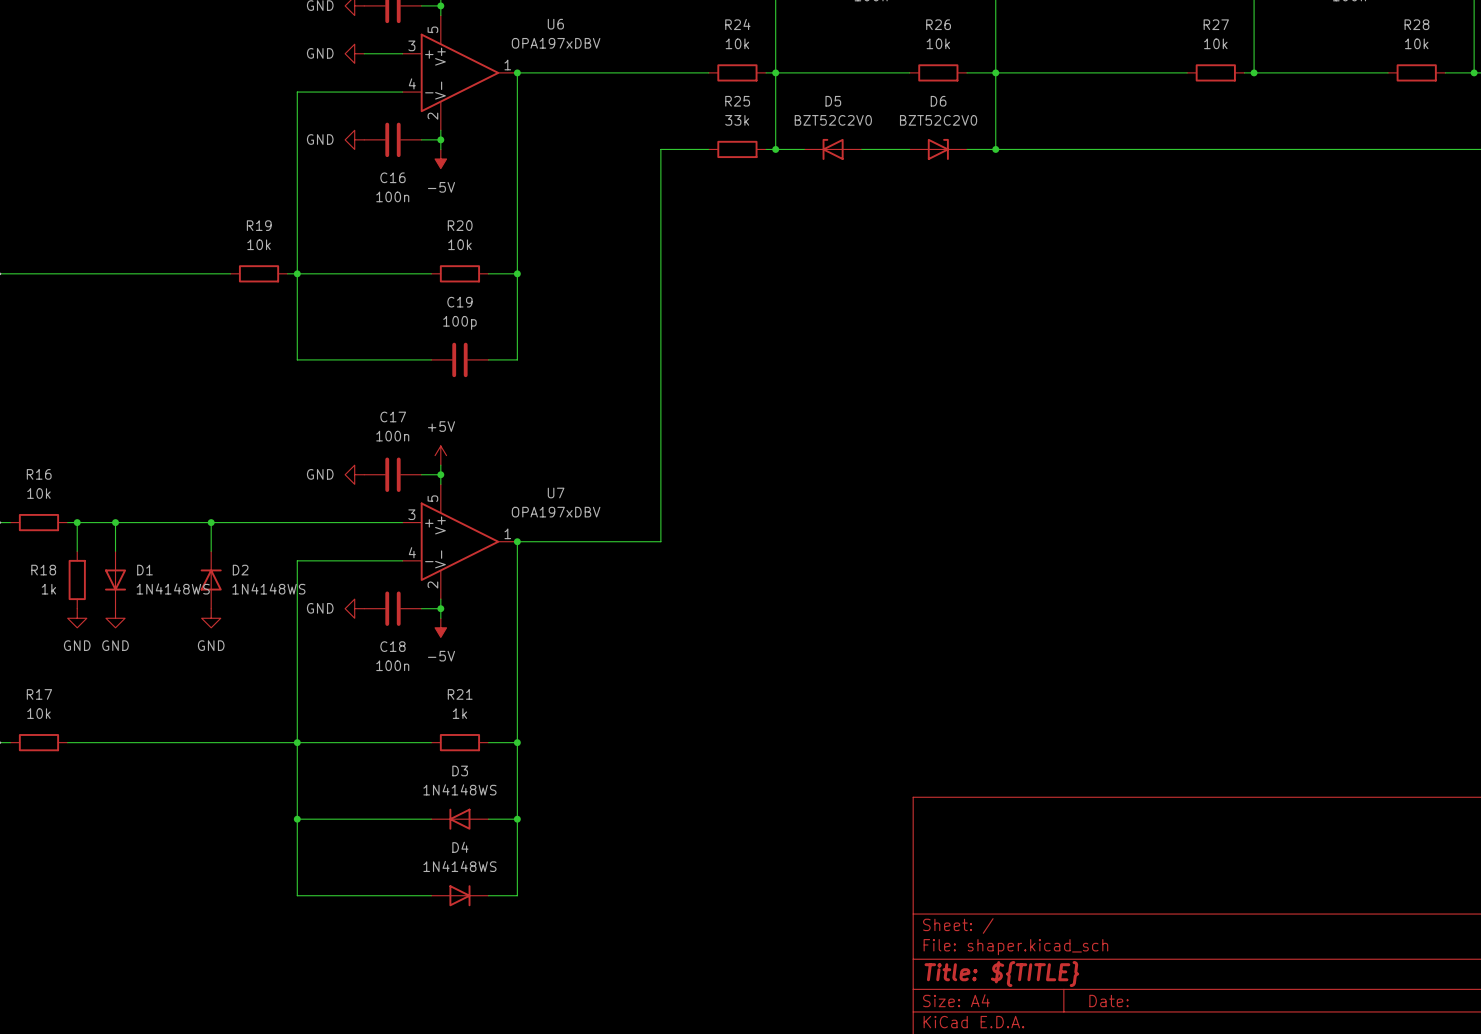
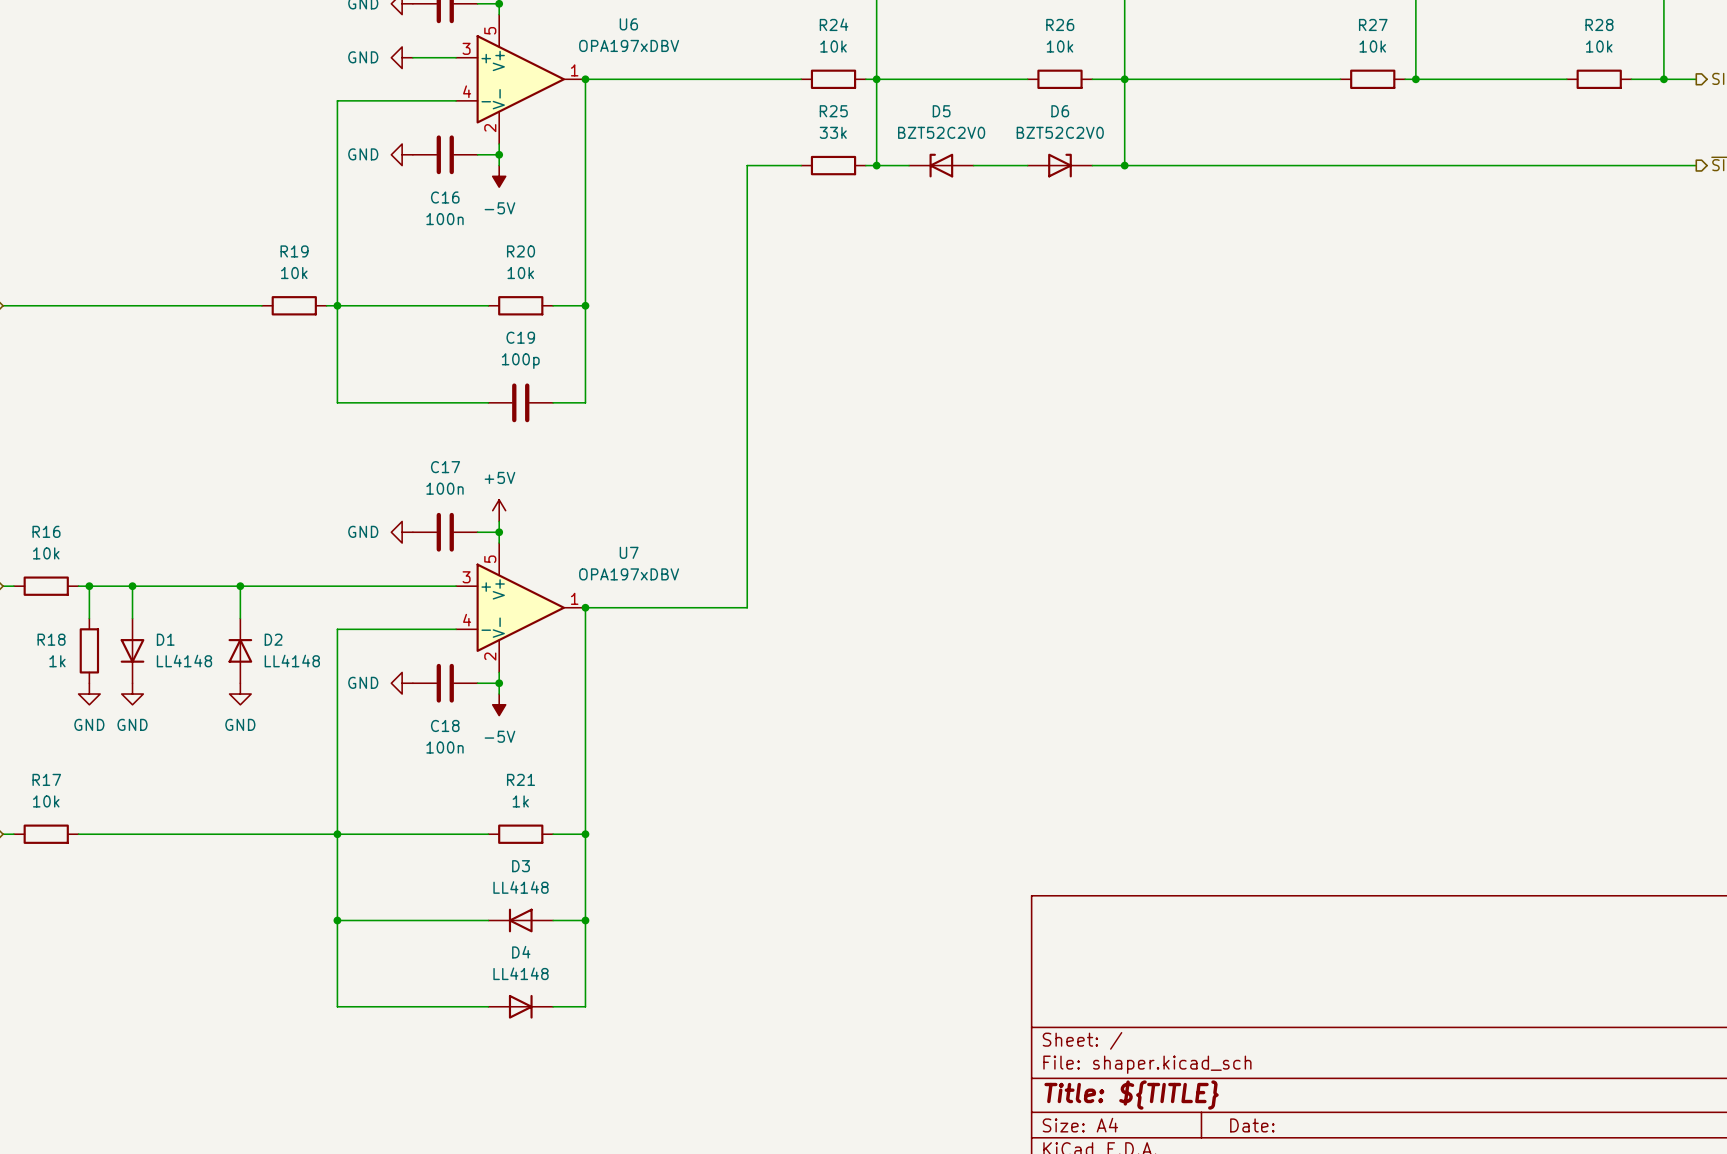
D1 value: 1N4148WS (173, 588) -> LL4148 (184, 661)
D2 value: 1N4148WS (268, 588) -> LL4148 (292, 661)
D3 value: 1N4148WS (459, 789) -> LL4148 (521, 887)
D4 value: 1N4148WS (459, 866) -> LL4148 (521, 973)

